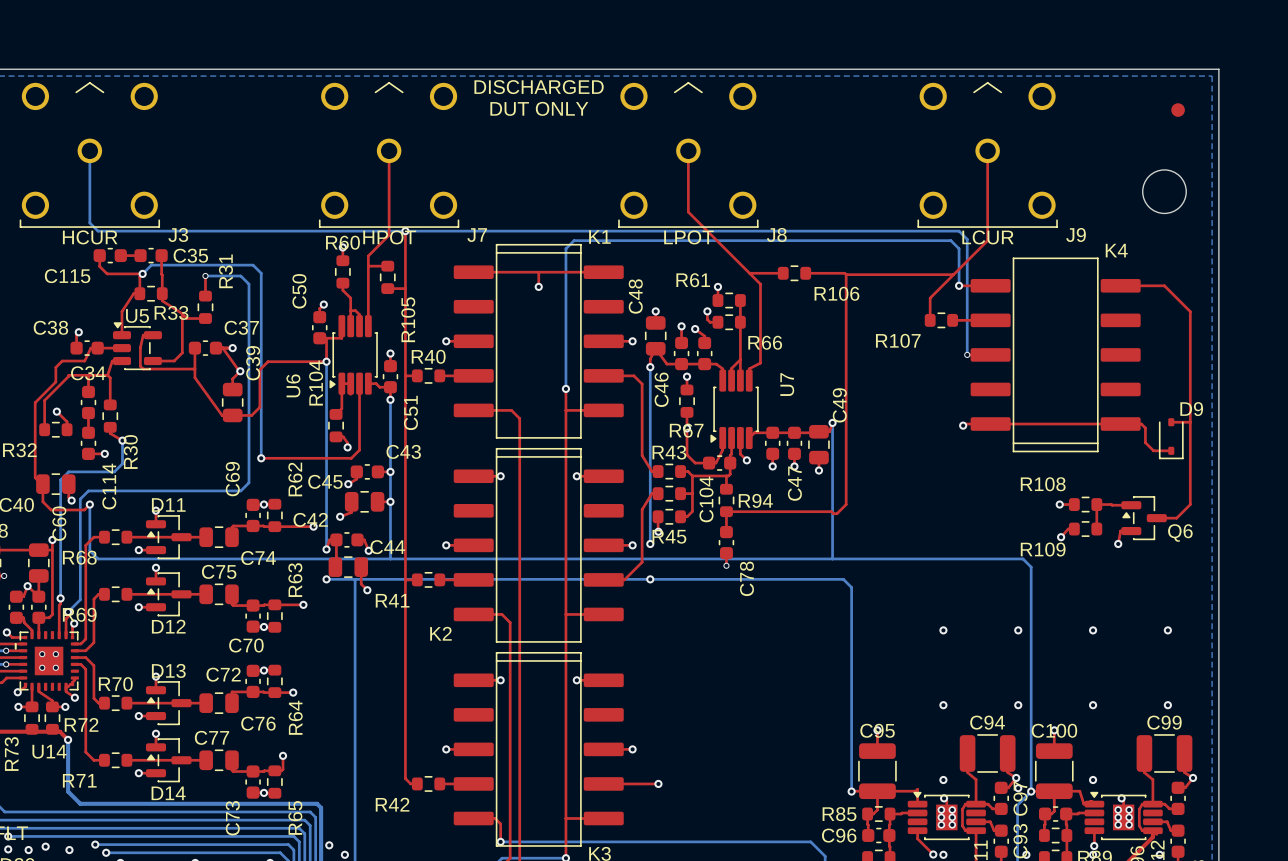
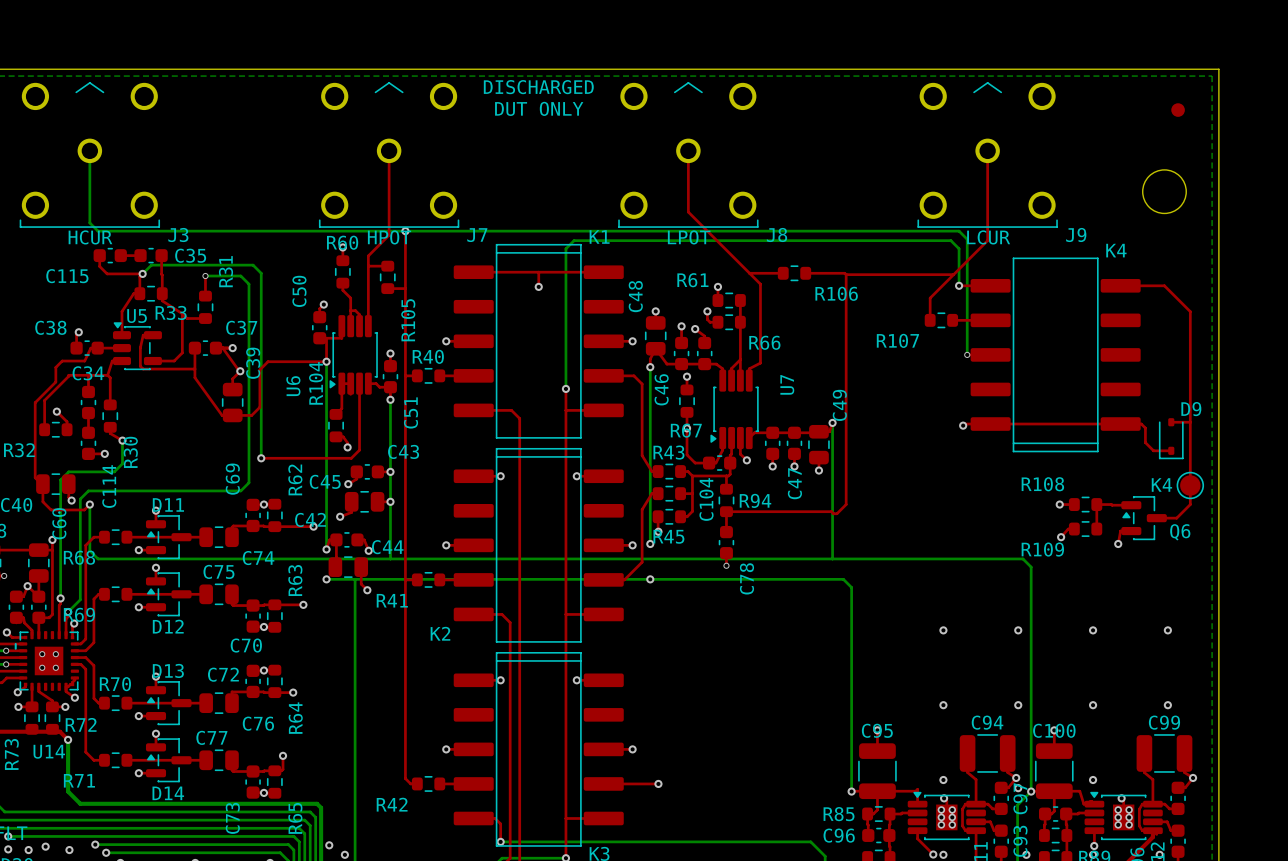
text: none -> K4 (1161, 484)
part: none -> (1190, 485)

